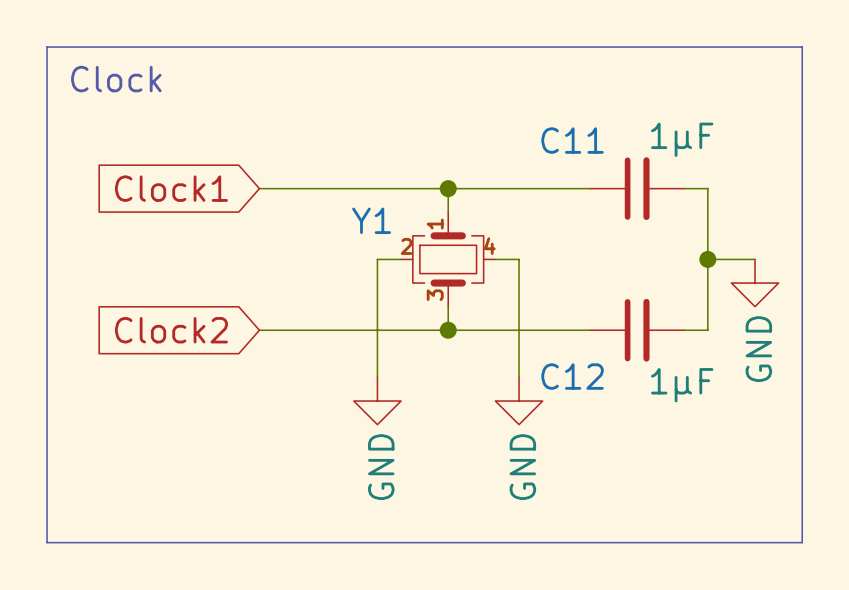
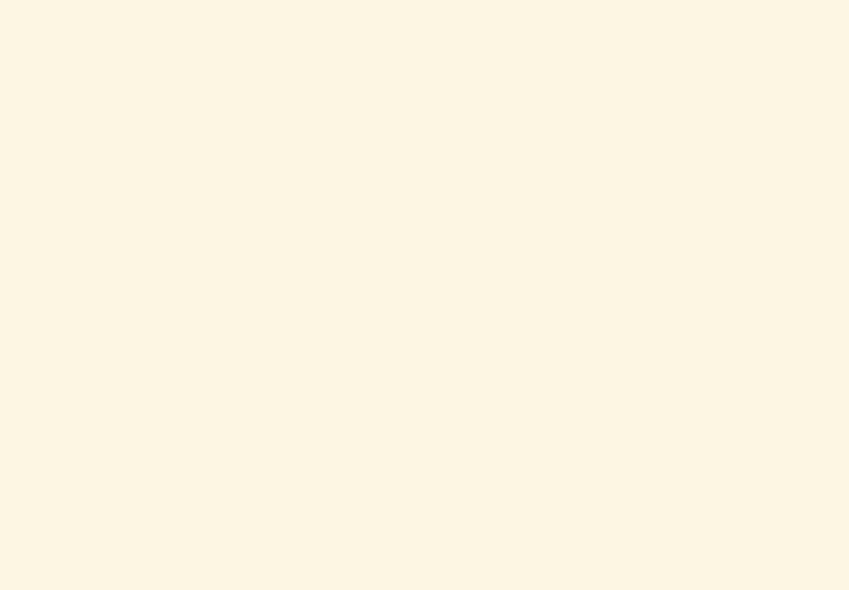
line: (47, 47) (802, 47) (802, 542) (47, 542) (47, 47) -> none
text: Clock (116, 79) -> none
global label: Clock1 (171, 188) -> none
wire: (259, 188) (589, 188) -> none
wire: (448, 188) (448, 212) -> none
junction: (448, 188) -> none
C11: 1µF (637, 188) -> none
wire: (684, 188) (707, 188) (707, 330) (684, 330) -> none
wire: (401, 259) (377, 259) (377, 377) -> none
Y1: (448, 259) -> none
wire: (495, 259) (519, 259) (519, 377) -> none
wire: (707, 259) (755, 259) -> none
junction: (707, 259) -> none
power symbol: GND (755, 283) -> none
wire: (448, 306) (448, 330) -> none
global label: Clock2 (171, 330) -> none
wire: (259, 330) (589, 330) -> none
junction: (448, 330) -> none
C12: 1µF (637, 330) -> none
power symbol: GND (377, 401) -> none
power symbol: GND (519, 401) -> none

